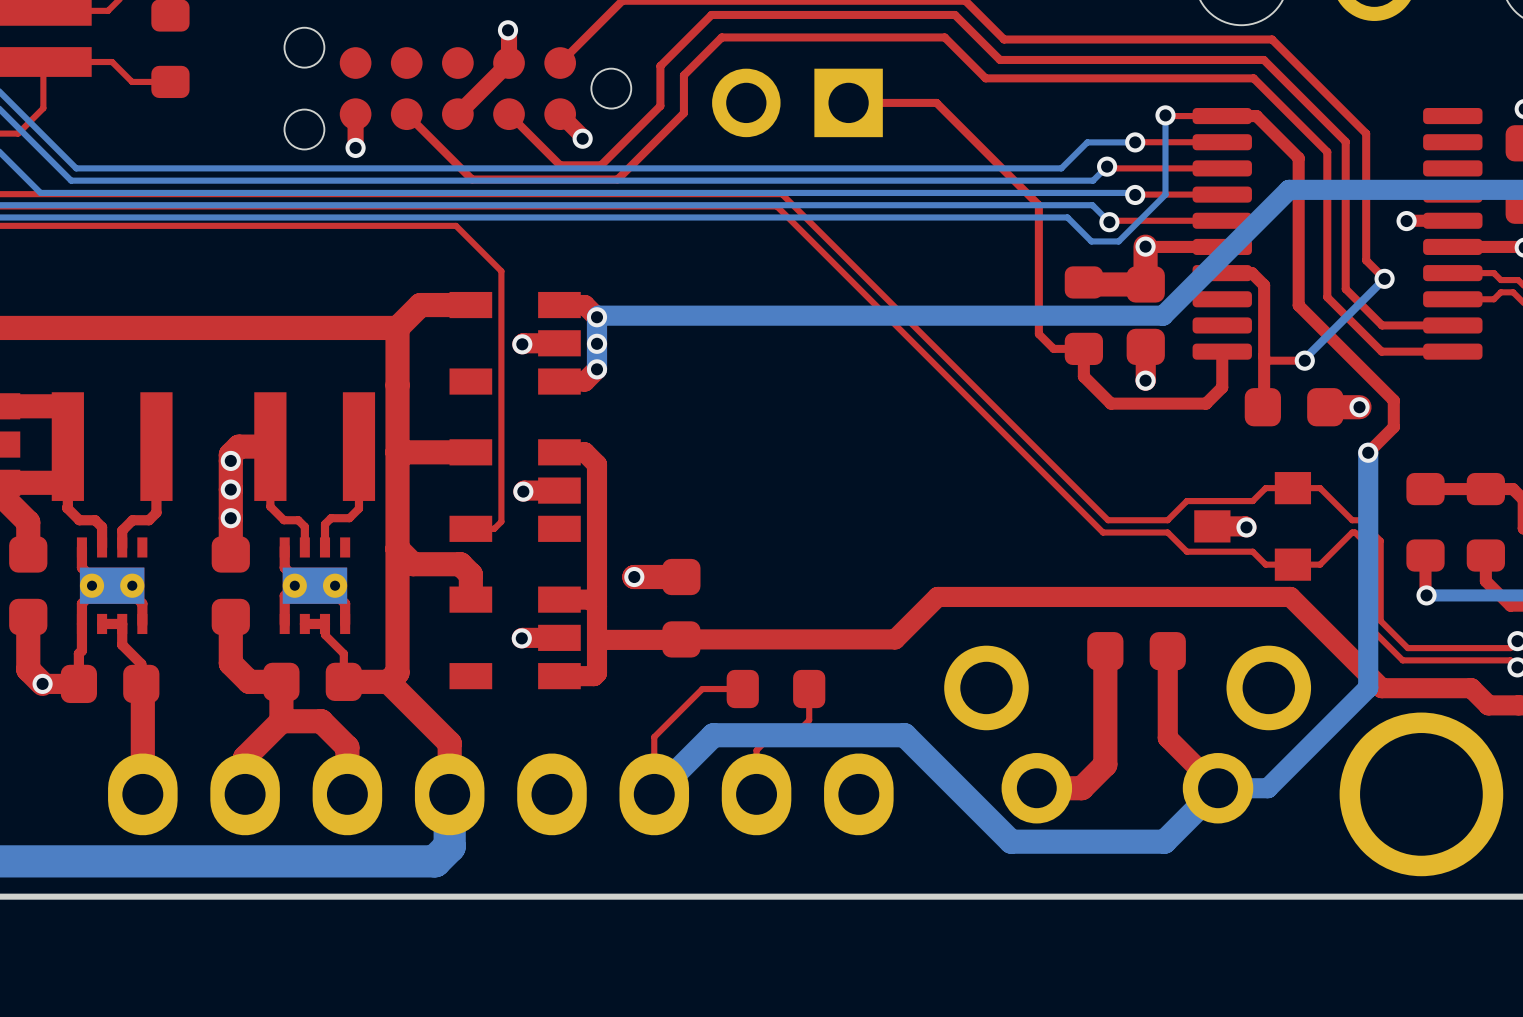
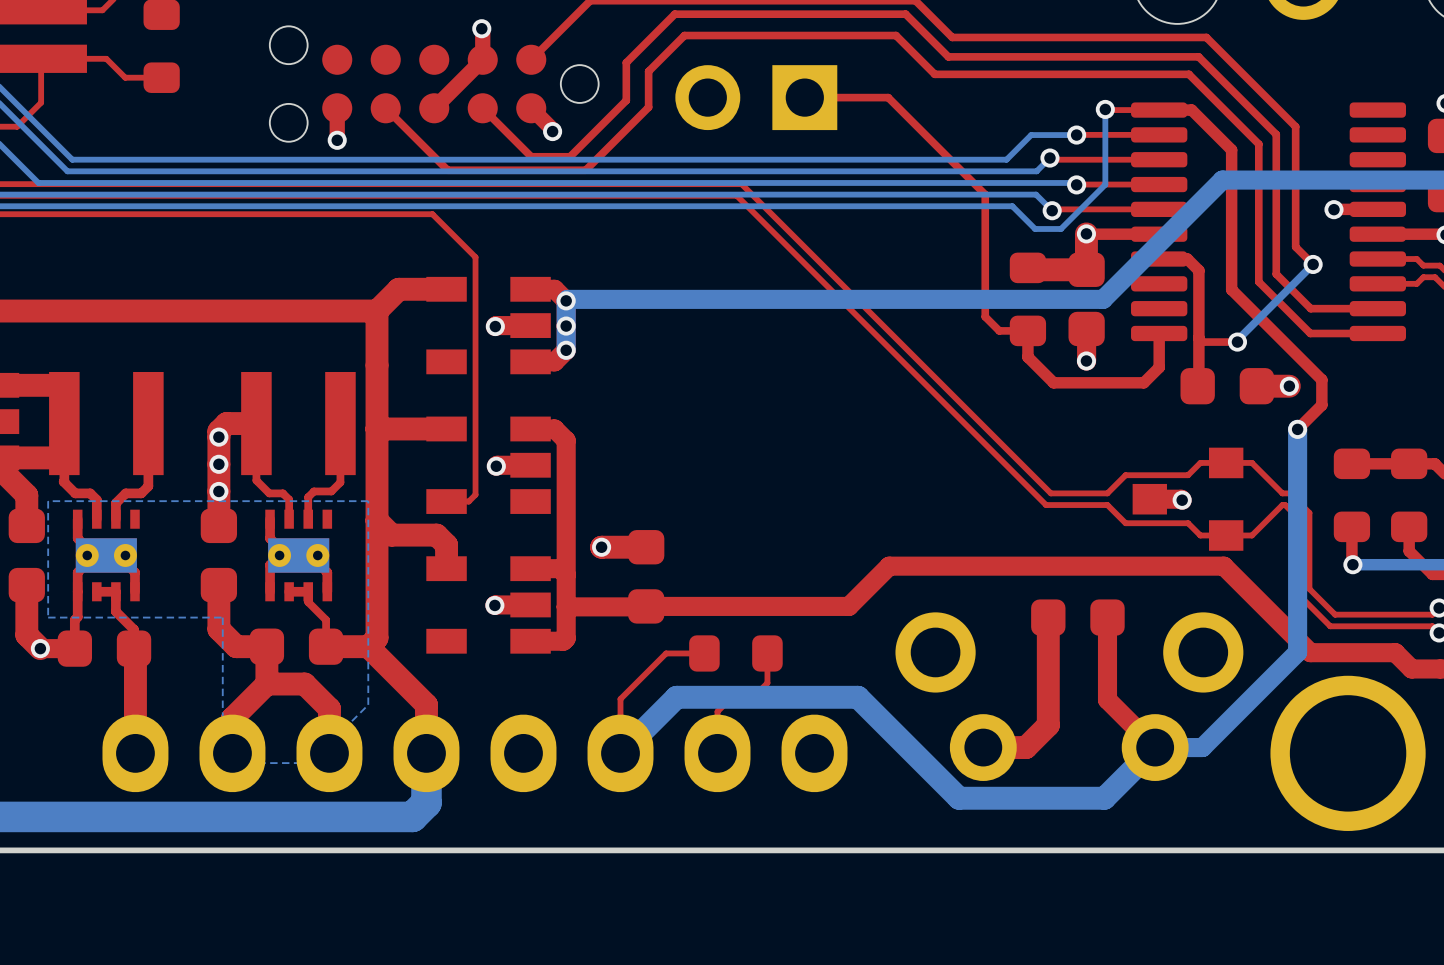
bottom zone outline: none -> (368, 501) (368, 704) (310, 763) (222, 763) (222, 617) (48, 617) (48, 501) (368, 501)

